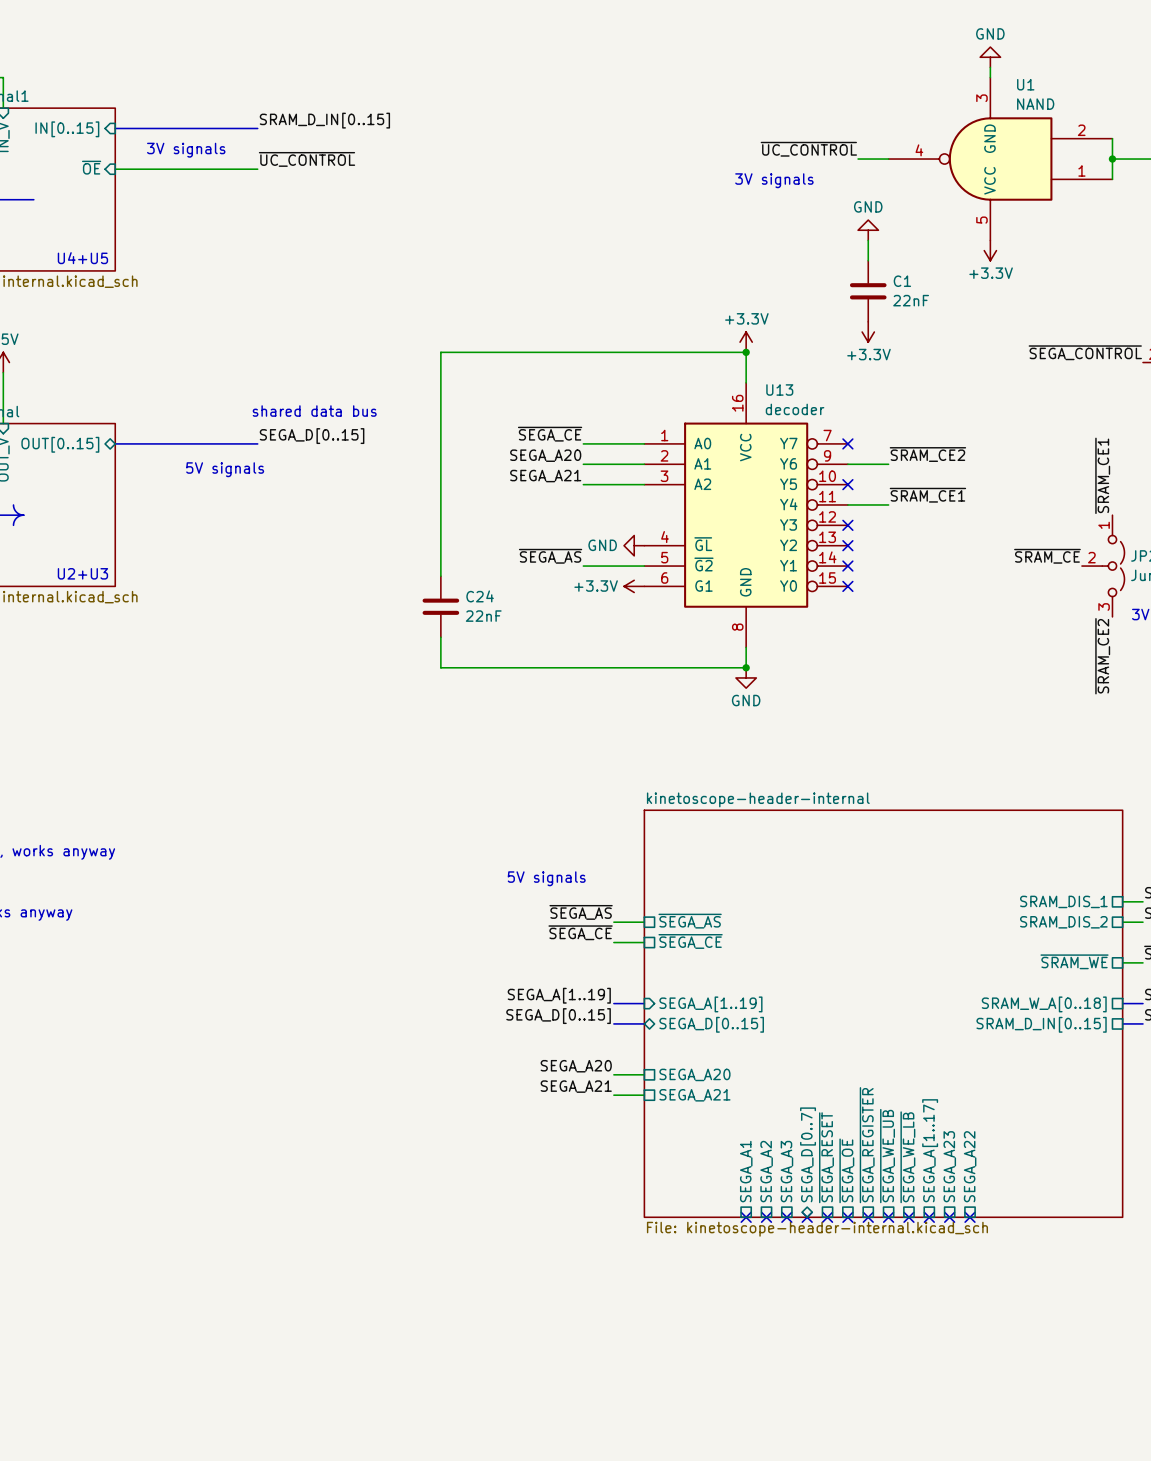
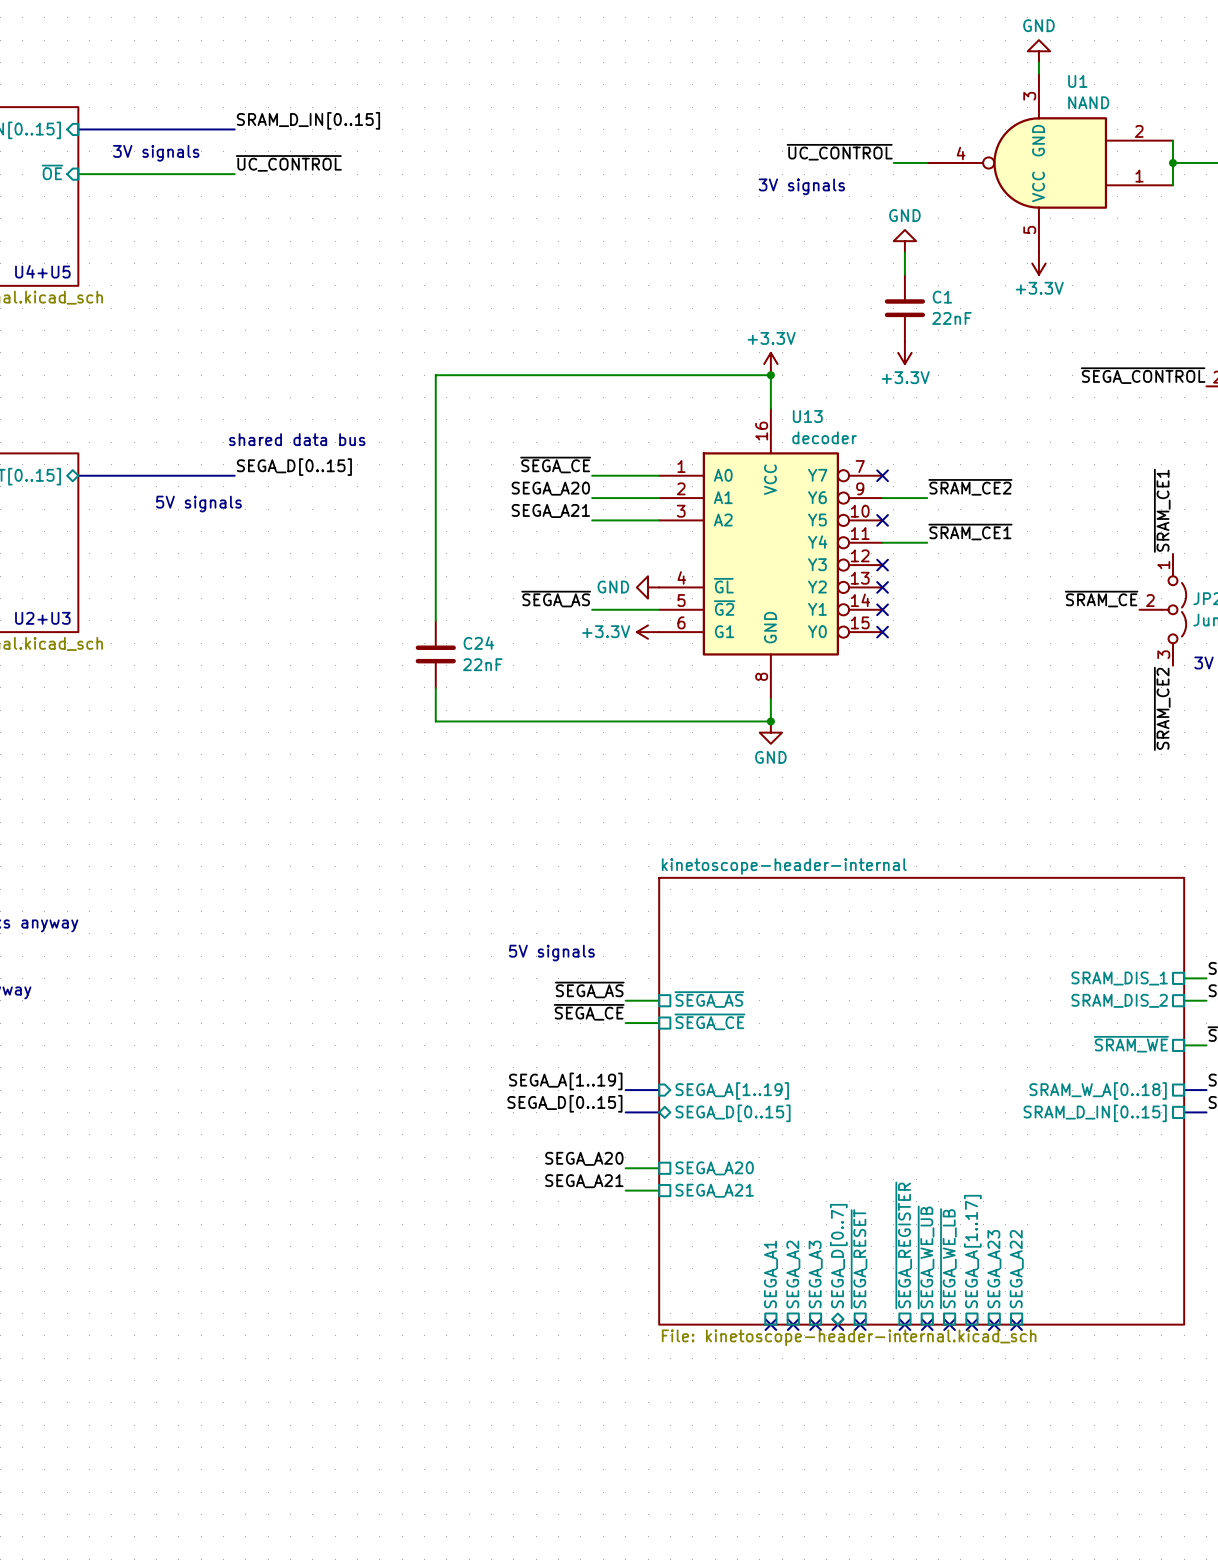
sheet pin: ~{SEGA_OE} (846, 1170) -> none
no-connect mark: (847, 1217) -> none

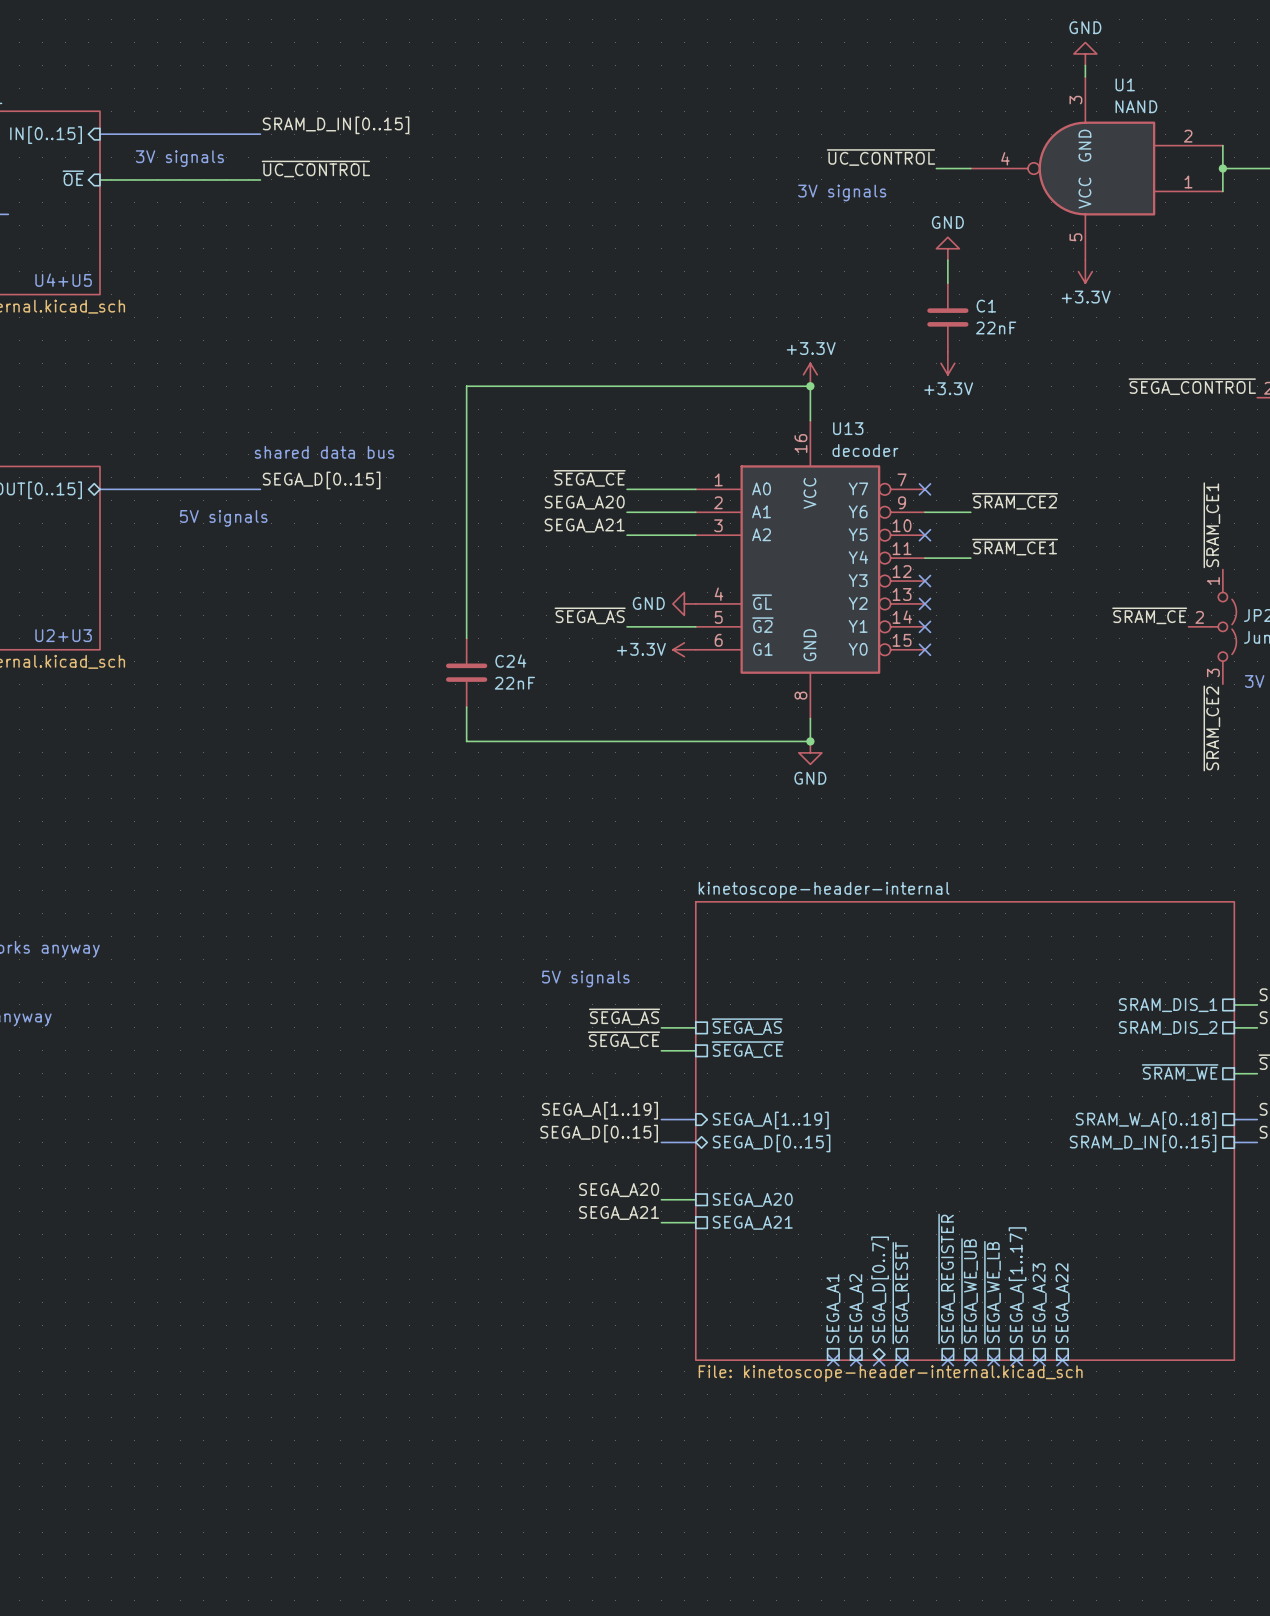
sheet pin: SEGA_A1 (770, 1274) -> none
sheet pin: SEGA_A2 (793, 1274) -> SEGA_A1 (833, 1308)
sheet pin: SEGA_A3 (815, 1274) -> SEGA_A2 (856, 1308)
no-connect mark: (770, 1324) -> none

